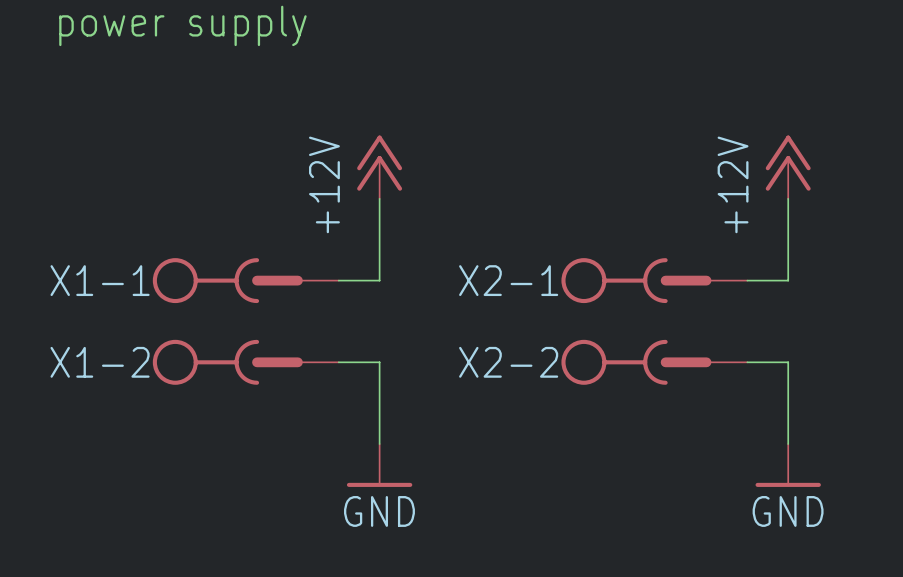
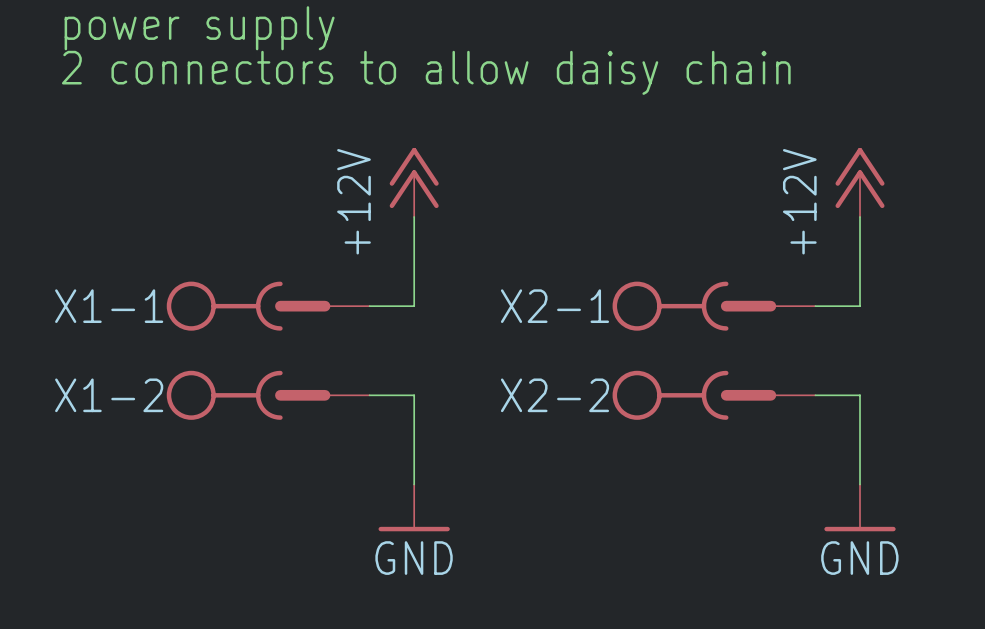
text: none -> 2 connectors to allow daisy chain (426, 72)

